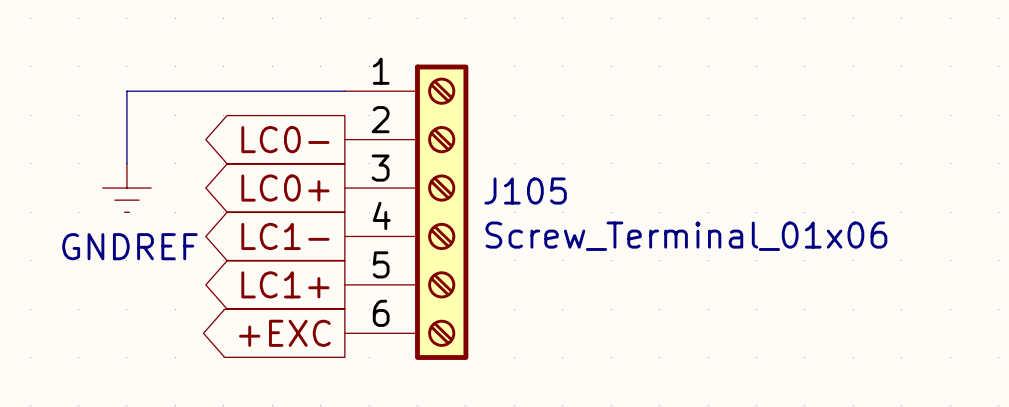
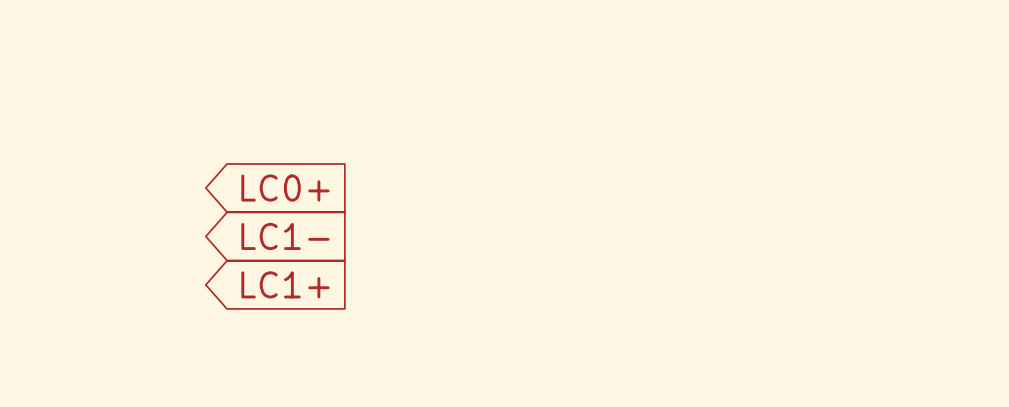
wire: (344, 91) (126, 91) (126, 163) -> none
global label: LC0- (285, 139) -> none
power symbol: GNDREF (126, 188) -> none
J105: Screw_Terminal_01x06 (406, 212) -> none
global label: +EXC (284, 333) -> none

